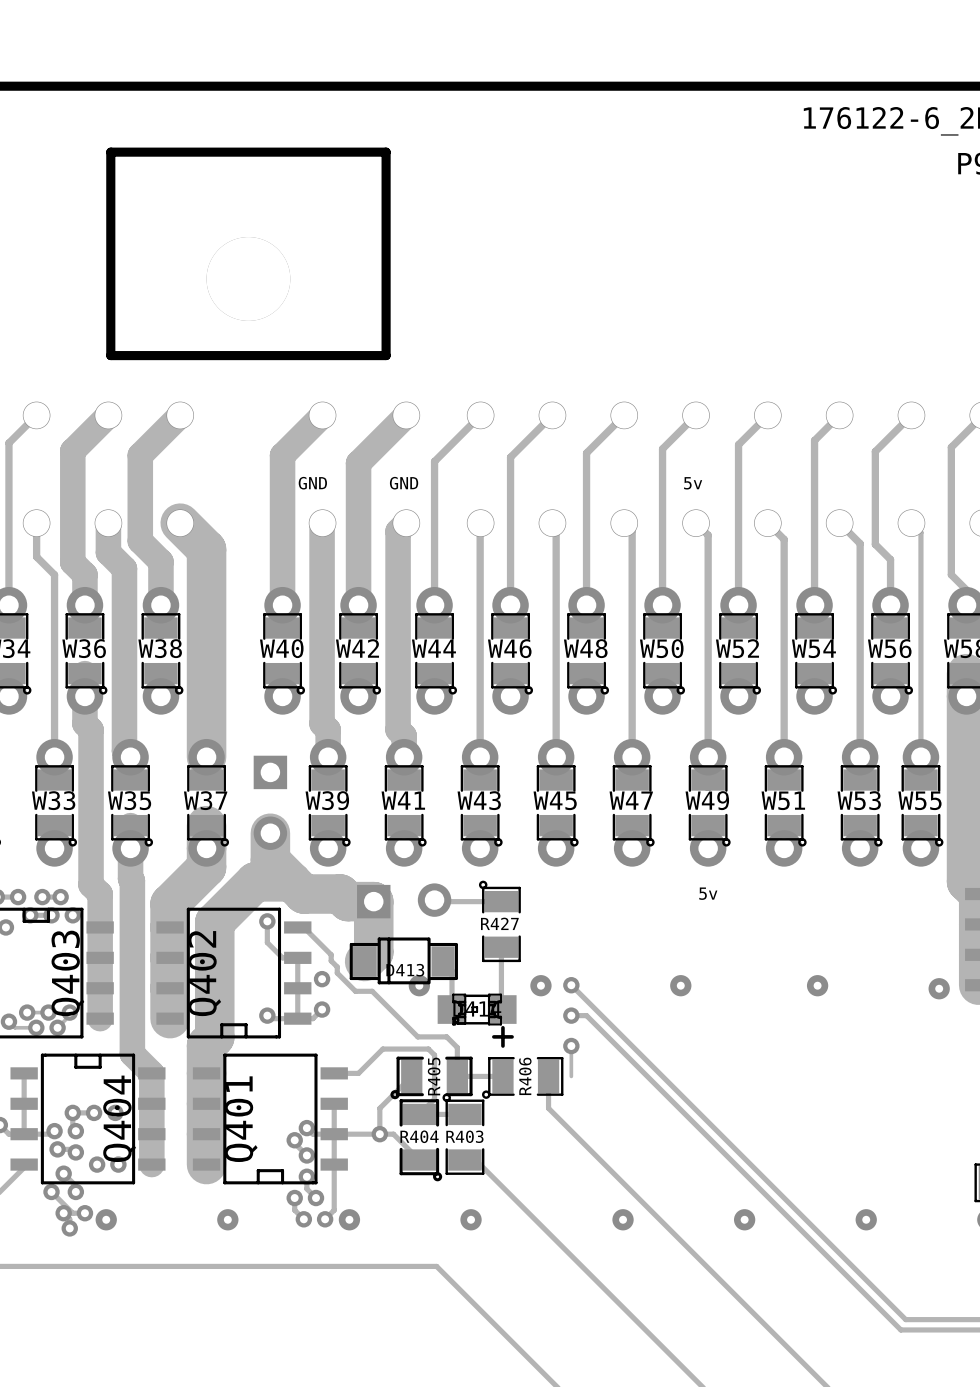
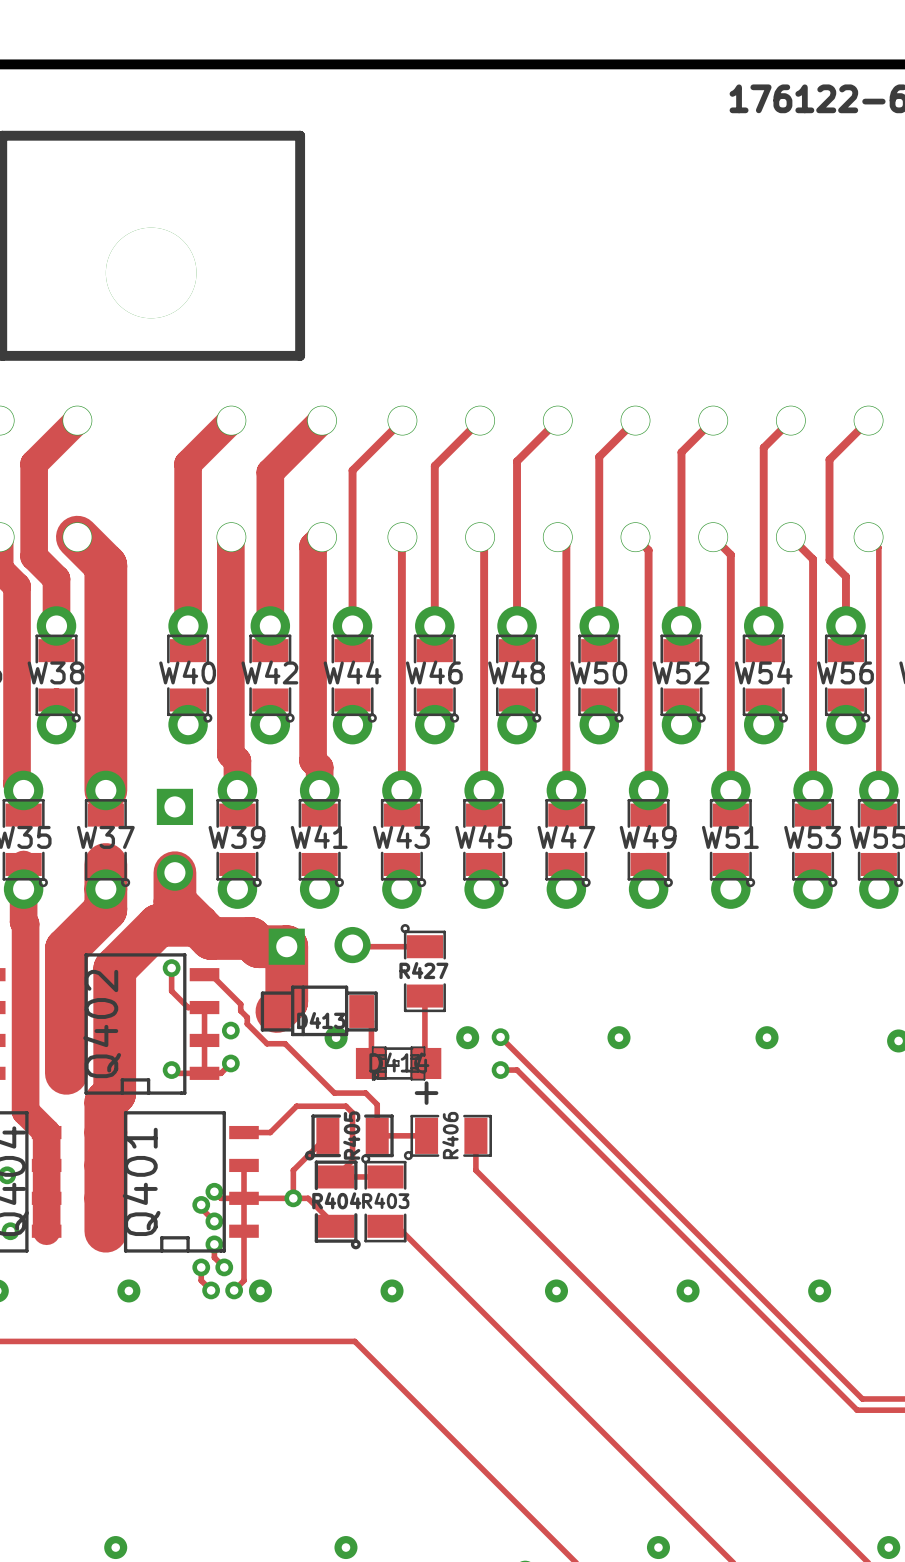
text: GND (312, 483) -> none
text: GND (404, 483) -> none
text: 5v (693, 483) -> none
text: 5v (708, 893) -> none
track: (571, 1046) (571, 1076) -> none
via: (571, 1046) -> none

